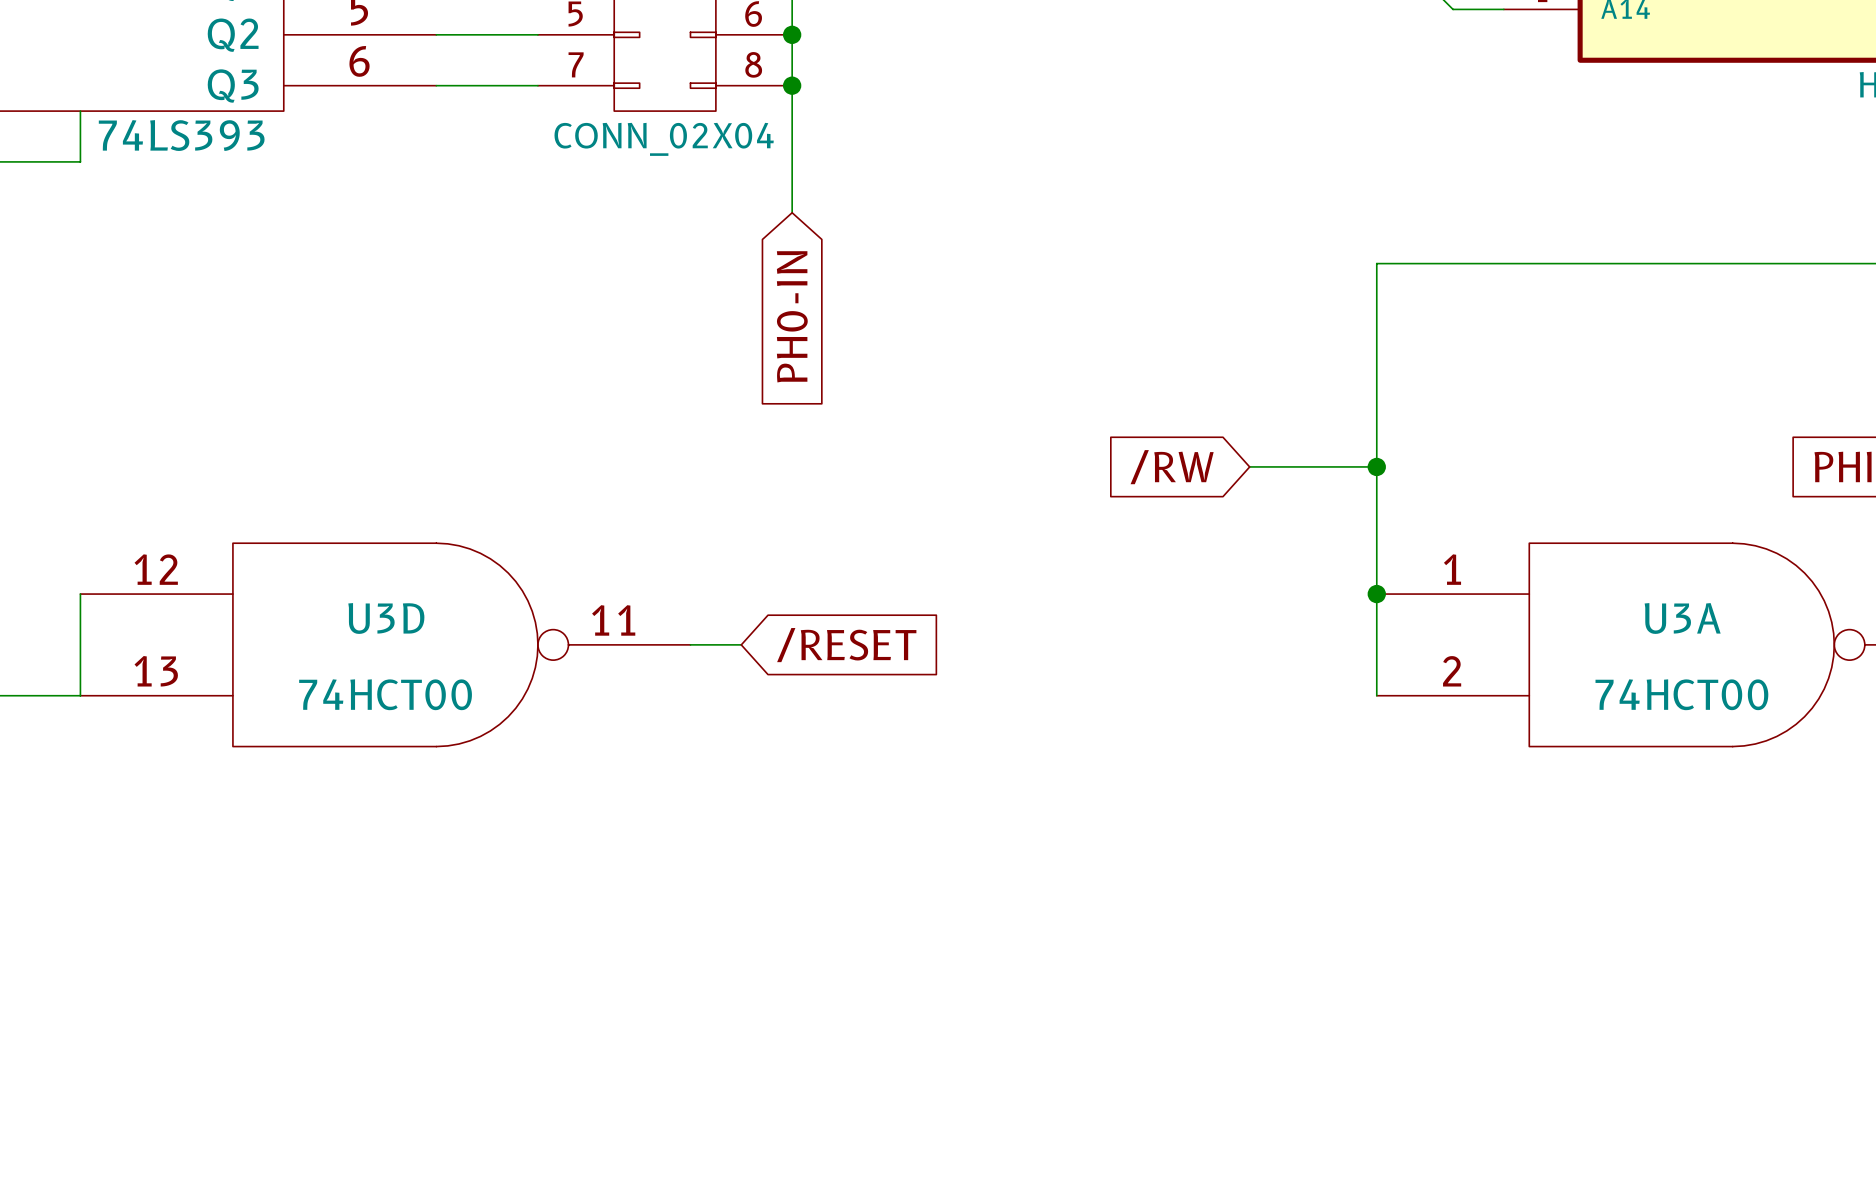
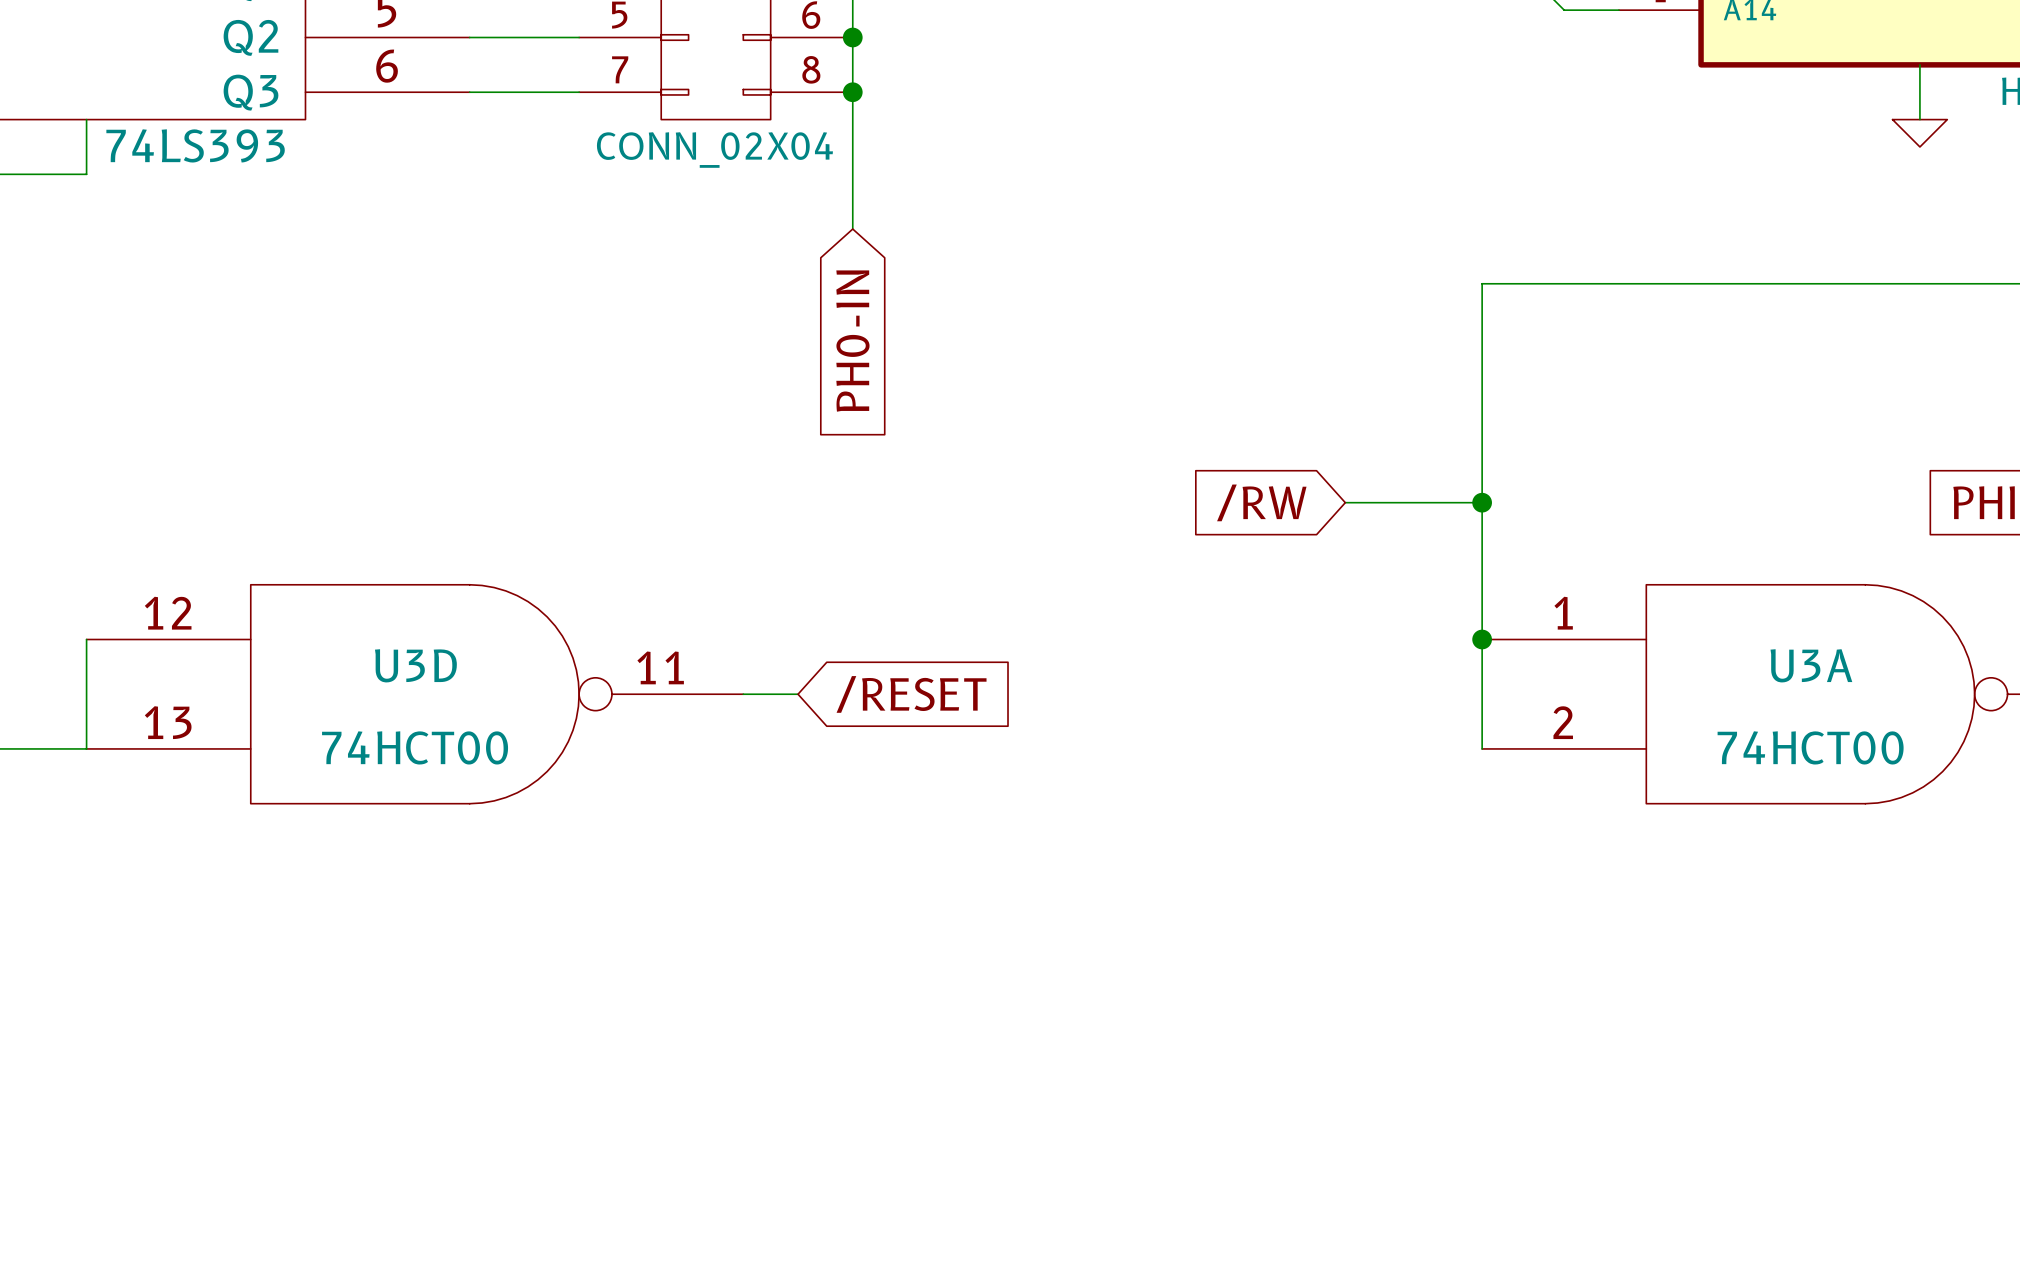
wire: none -> (1919, 64) (1919, 119)
power symbol: none -> (1919, 133)

